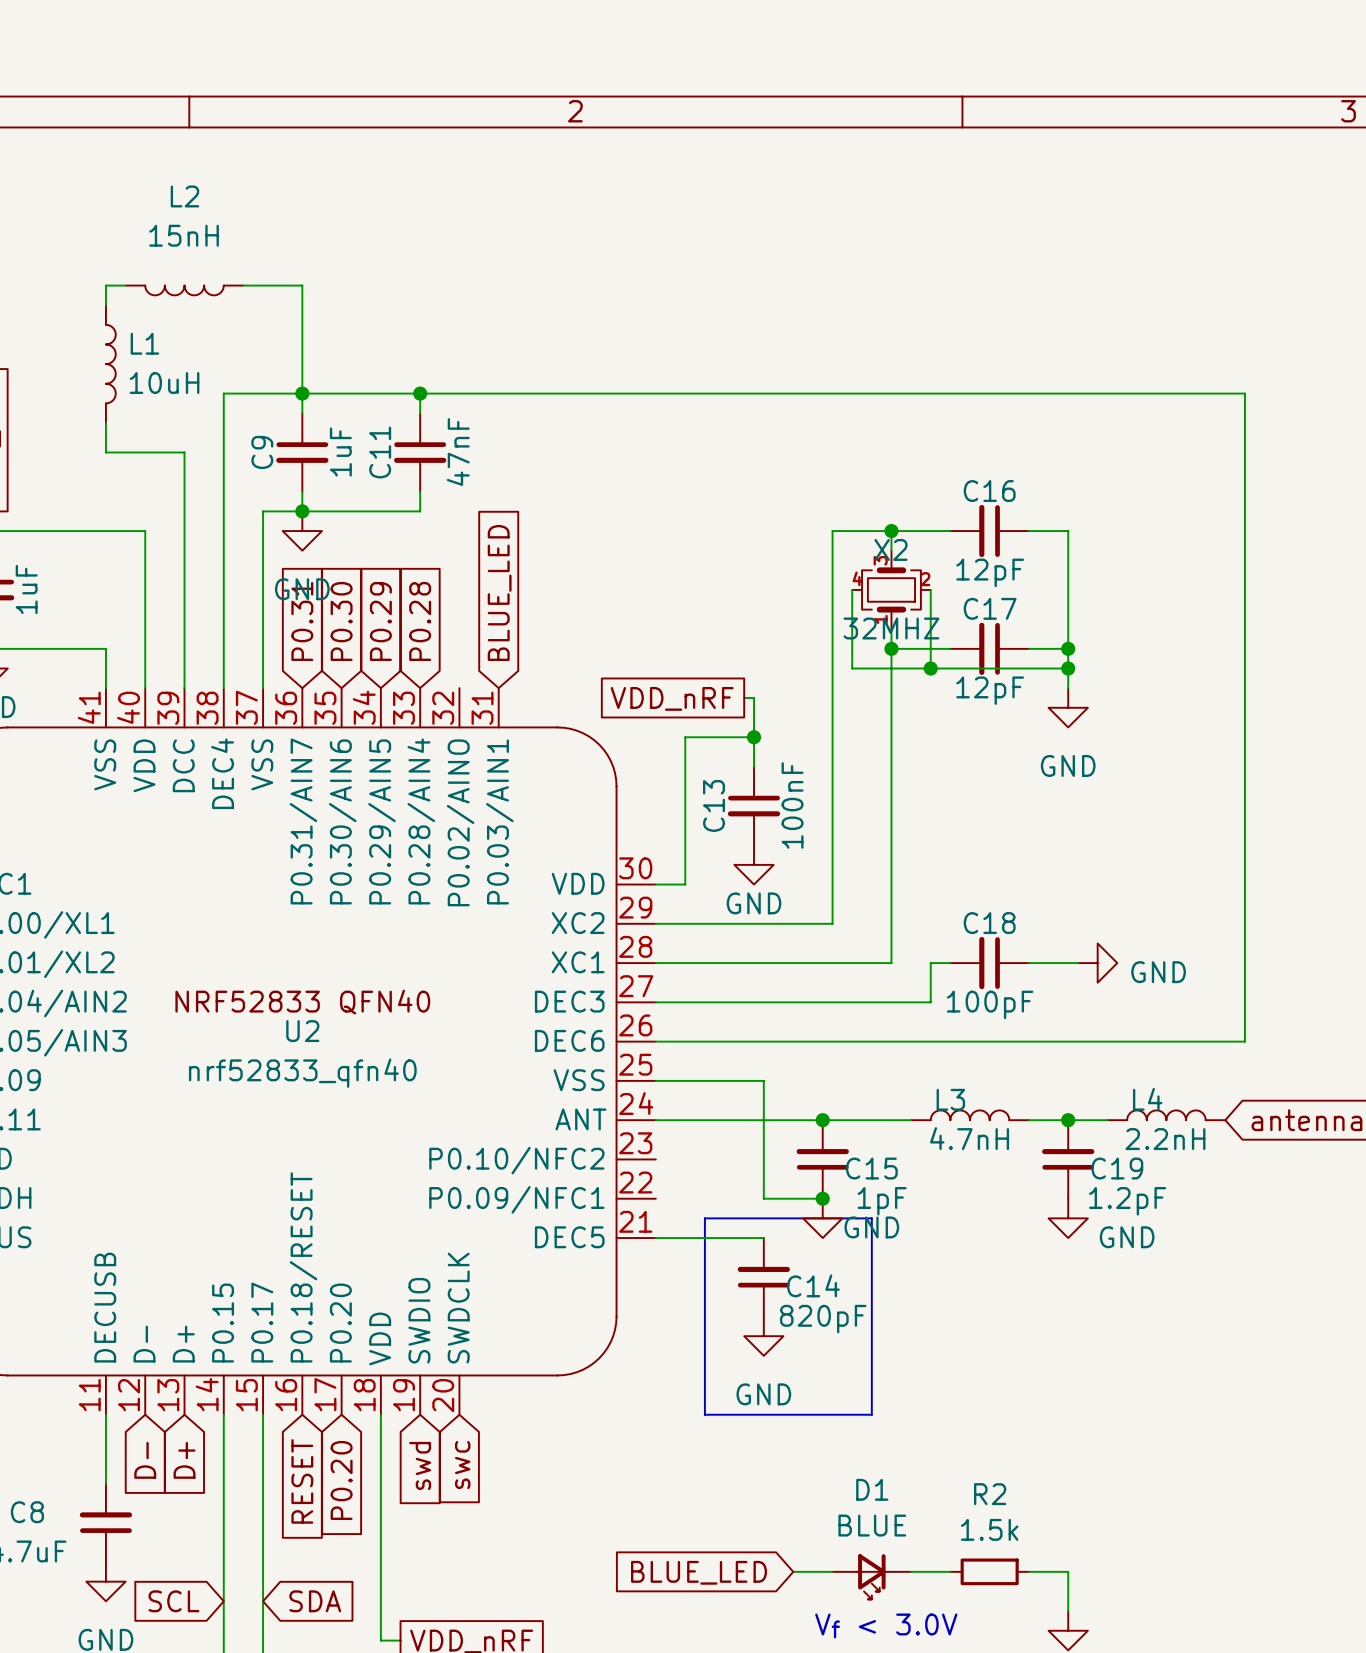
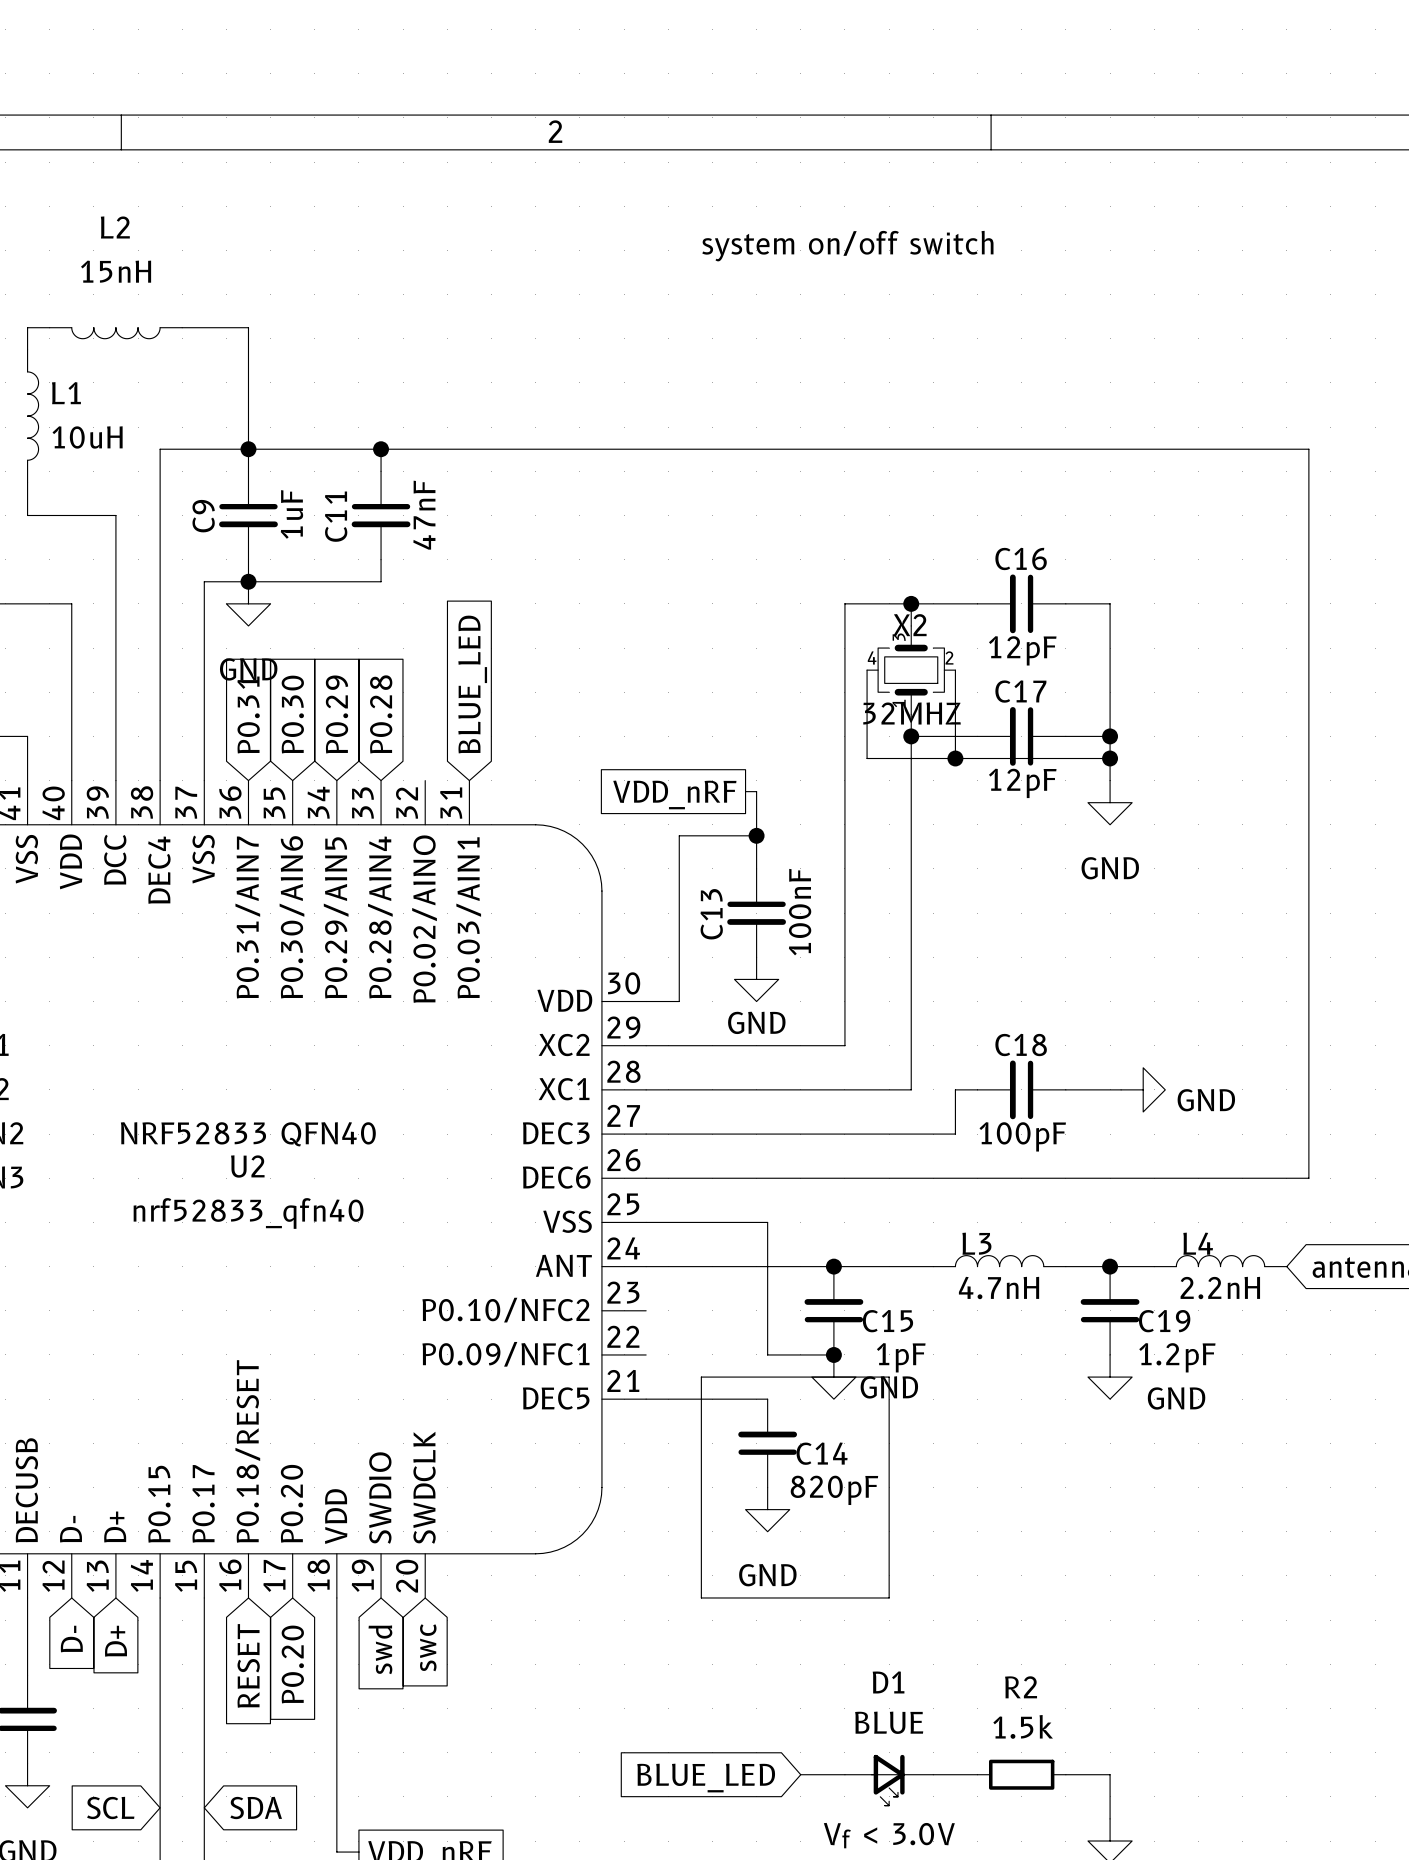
text: none -> system on/off switch (847, 246)

